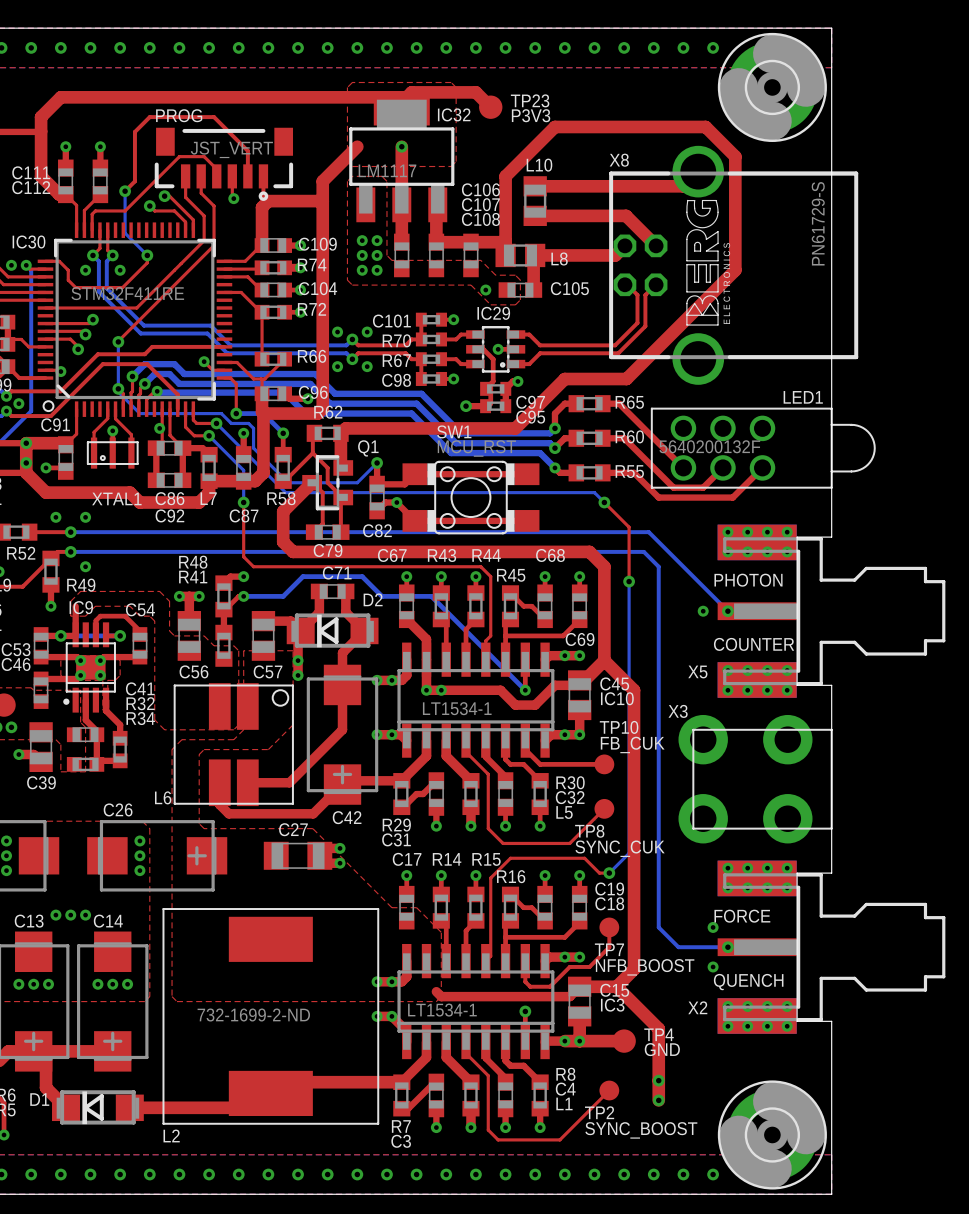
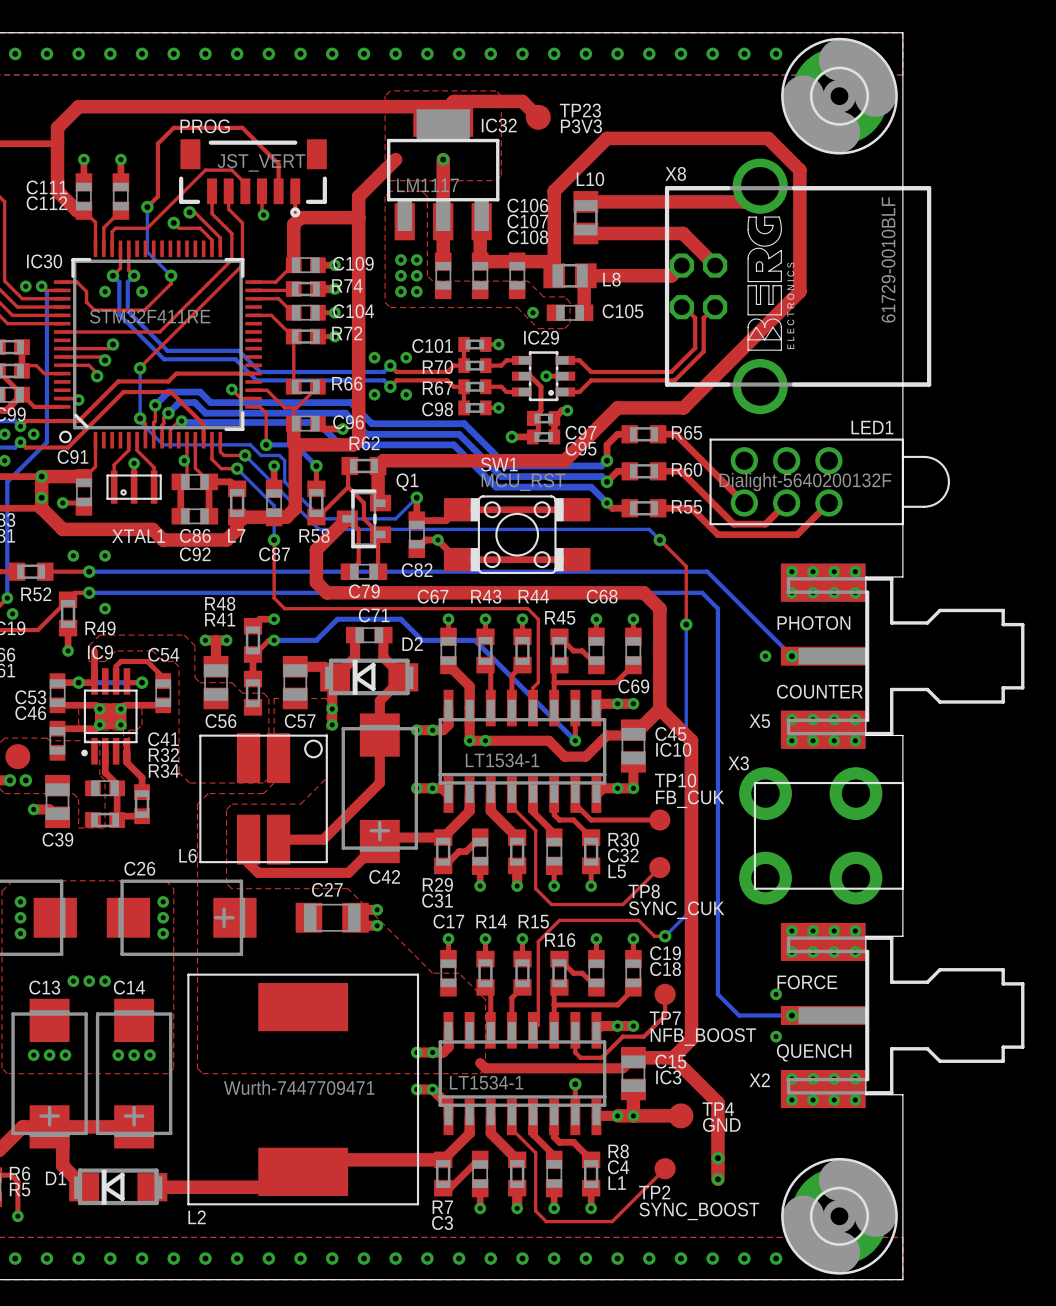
X8 value: PN61729-S (818, 223) -> 61729-0010BLF (888, 259)
LED1 value: 5640200132F (709, 446) -> Dialight-5640200132F (805, 482)
L2 value: 732-1699-2-ND (253, 1015) -> Wurth-7447709471 (299, 1087)

